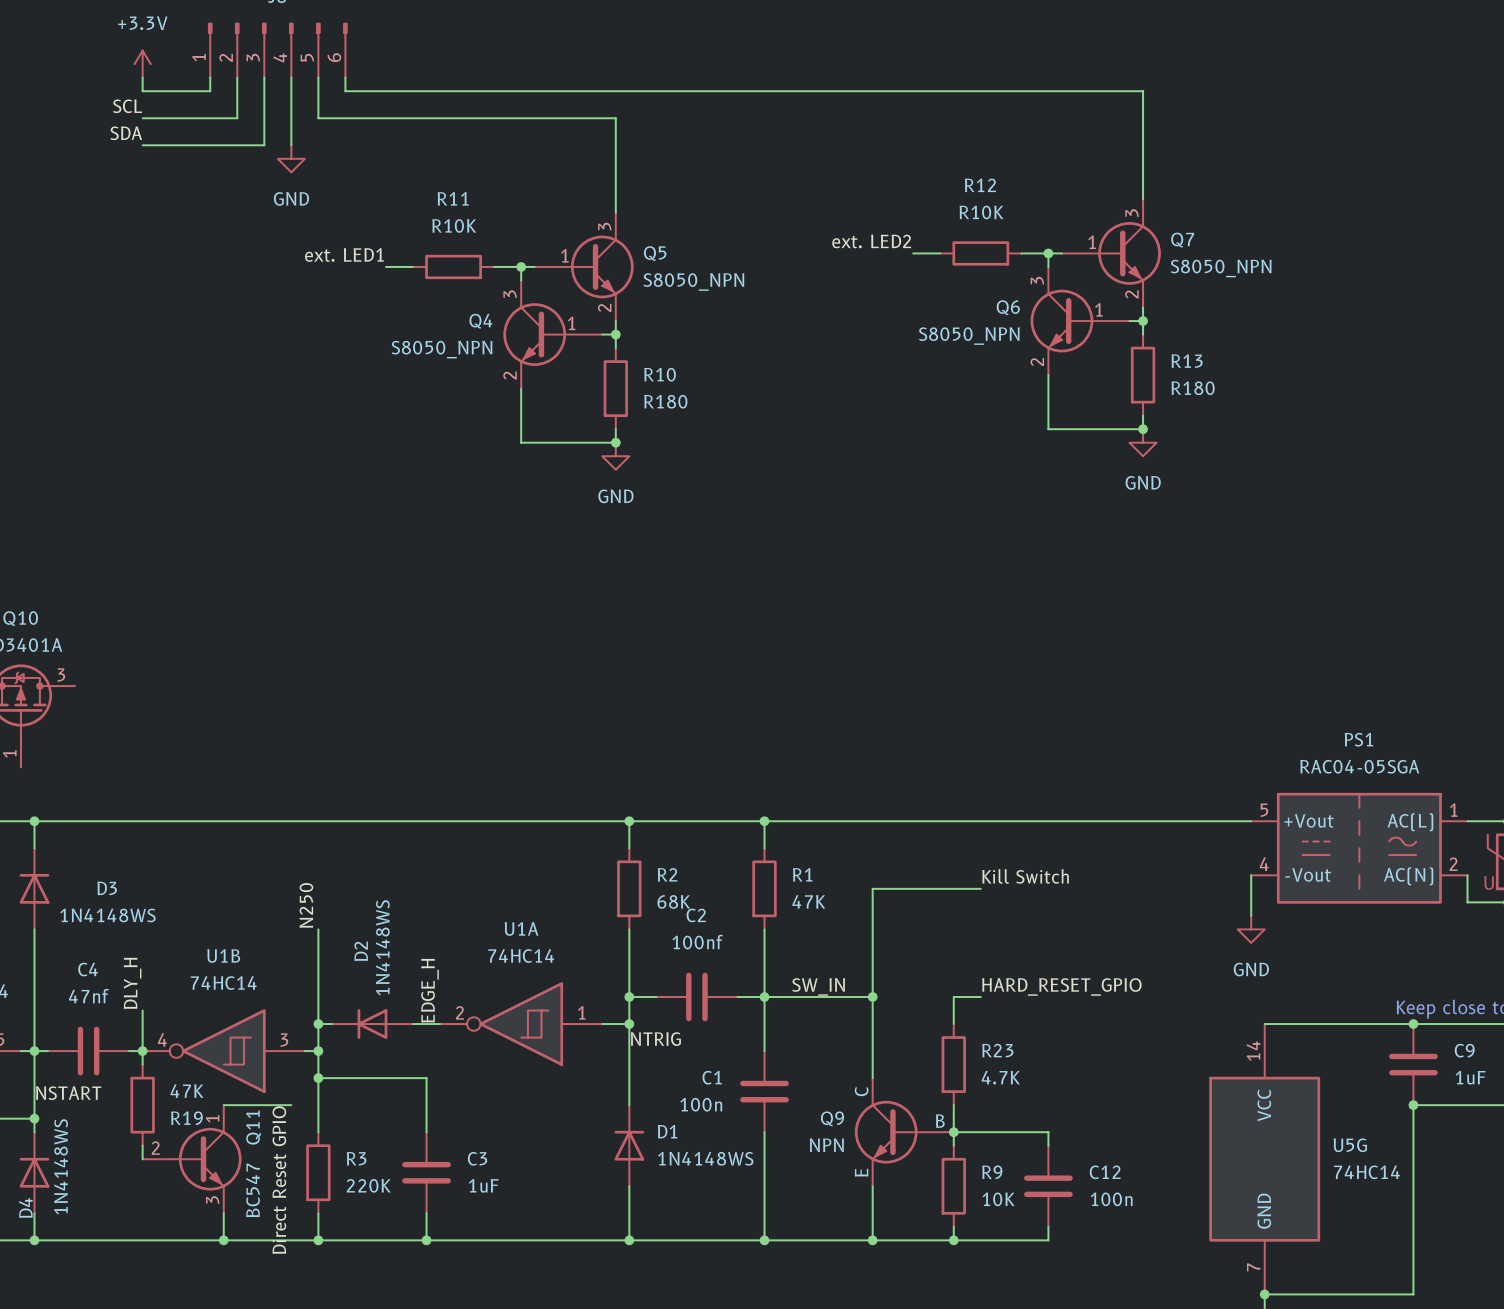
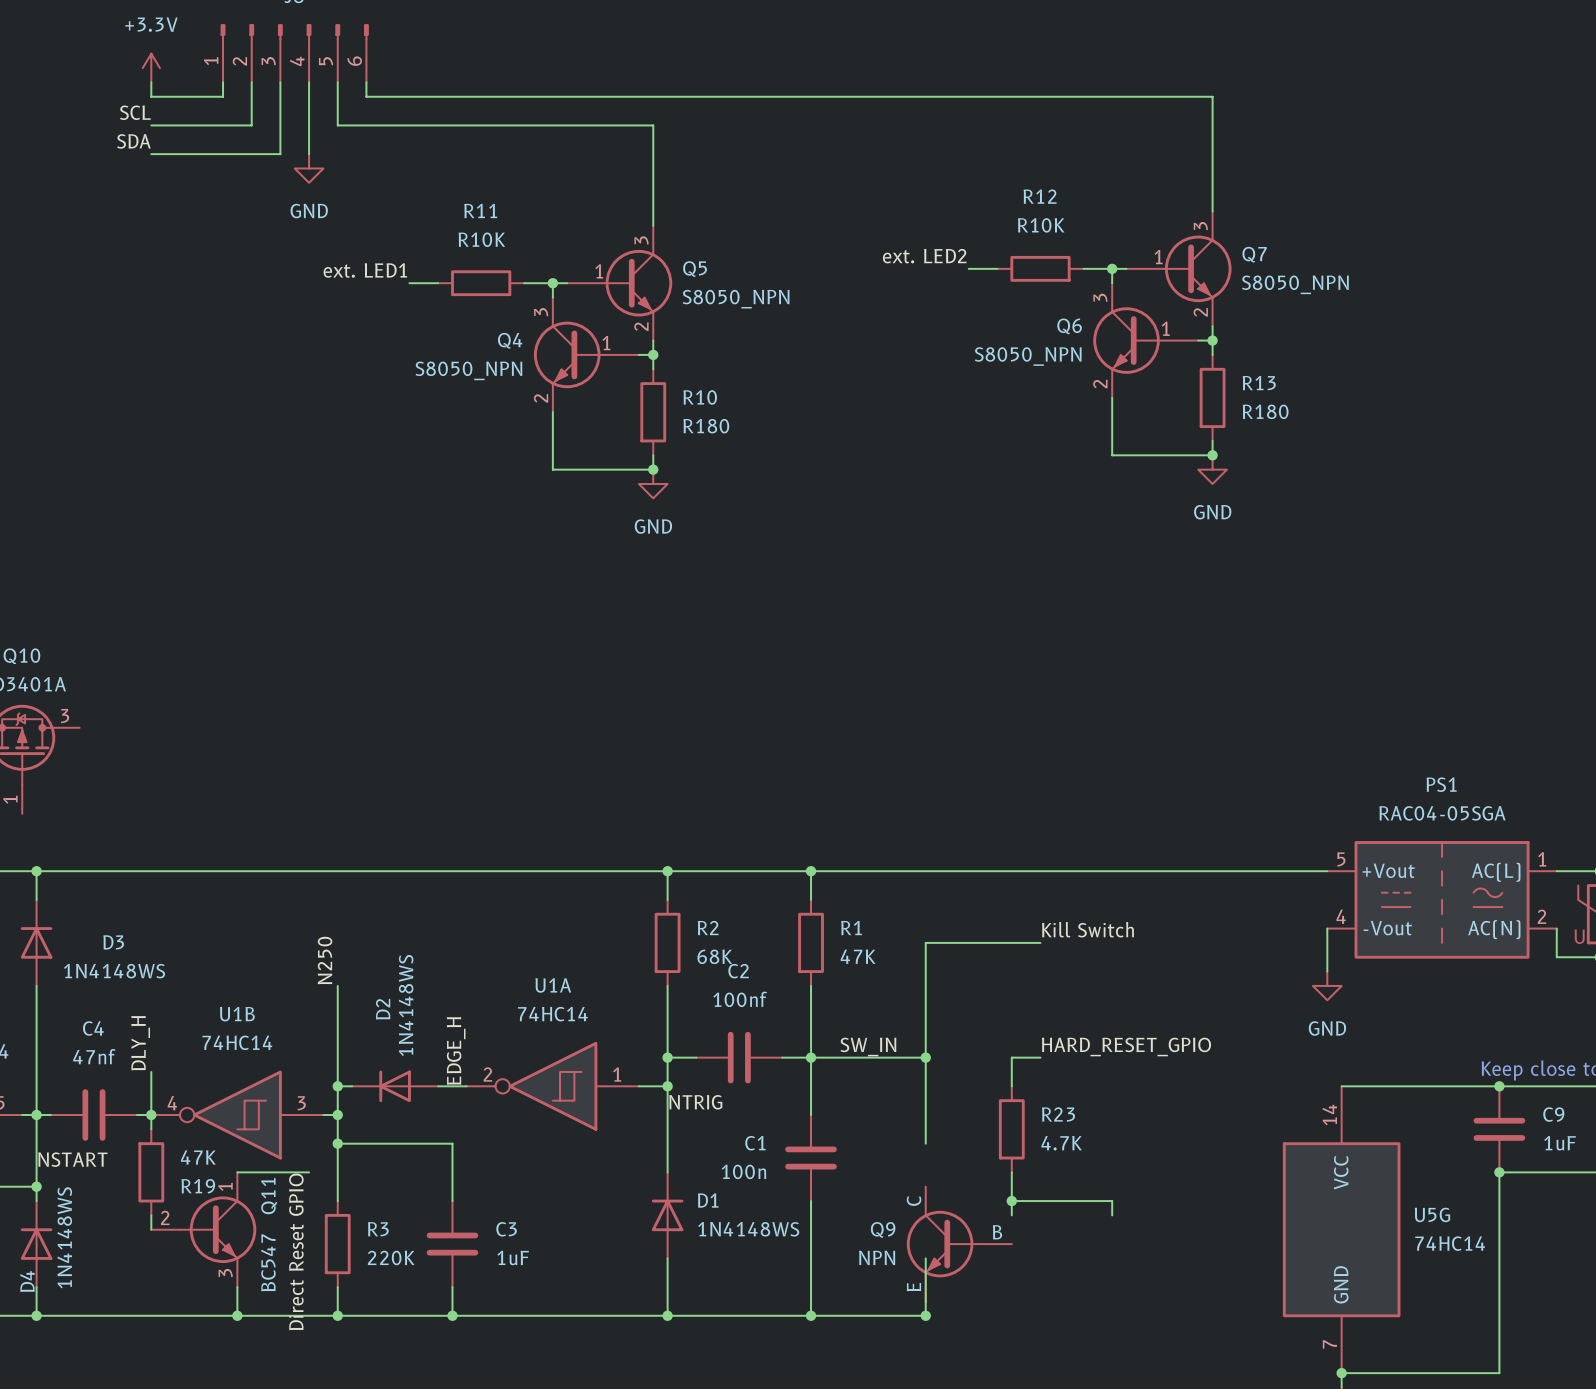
Q9 position: (904, 1132) -> (959, 1244)
R9: 10K (953, 1186) -> none
C12: 100n (1048, 1186) -> none
wire: (953, 1226) (953, 1240) -> none
wire: (1048, 1226) (1048, 1240) (872, 1240) -> none
junction: (953, 1240) -> none

